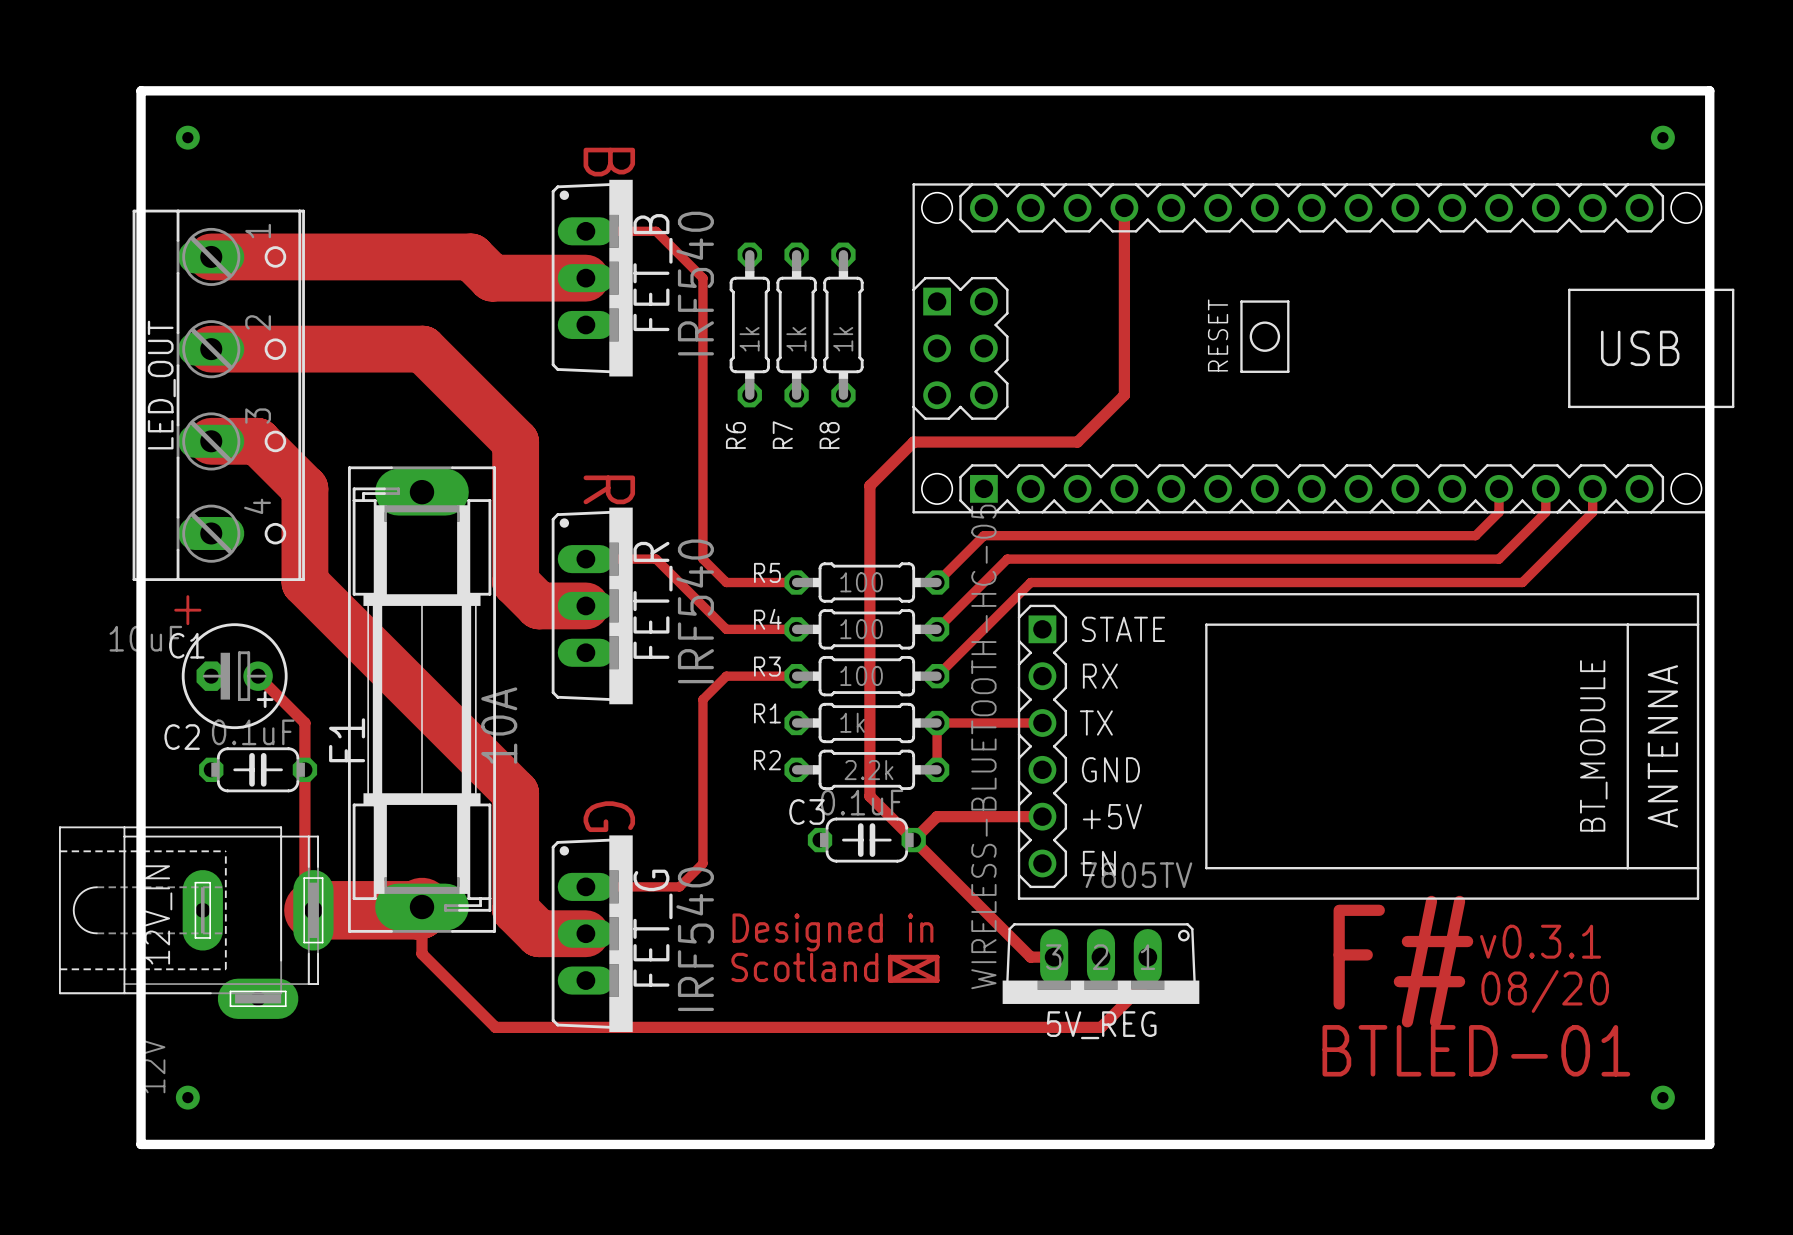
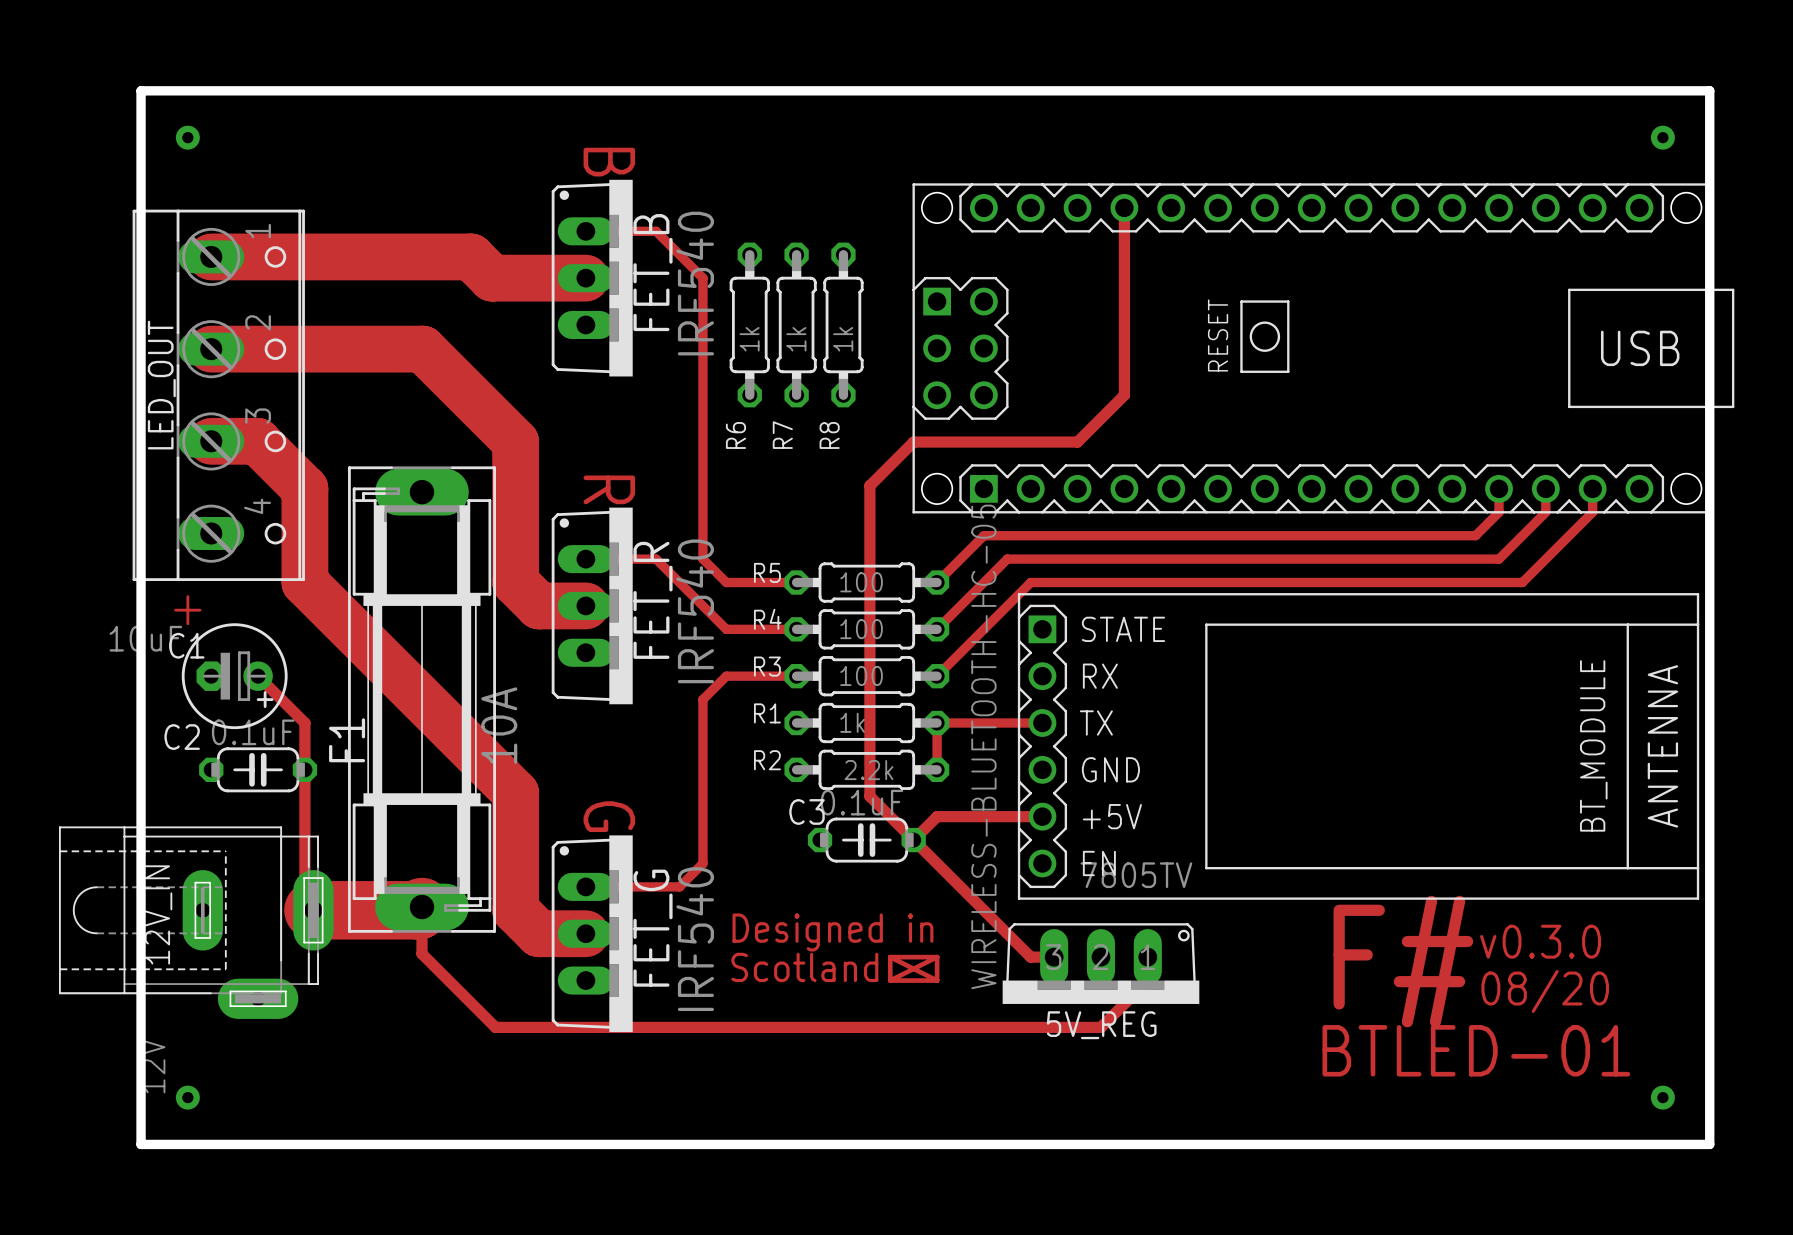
text: v0.3.1 (1540, 941) -> v0.3.0 (1540, 941)

